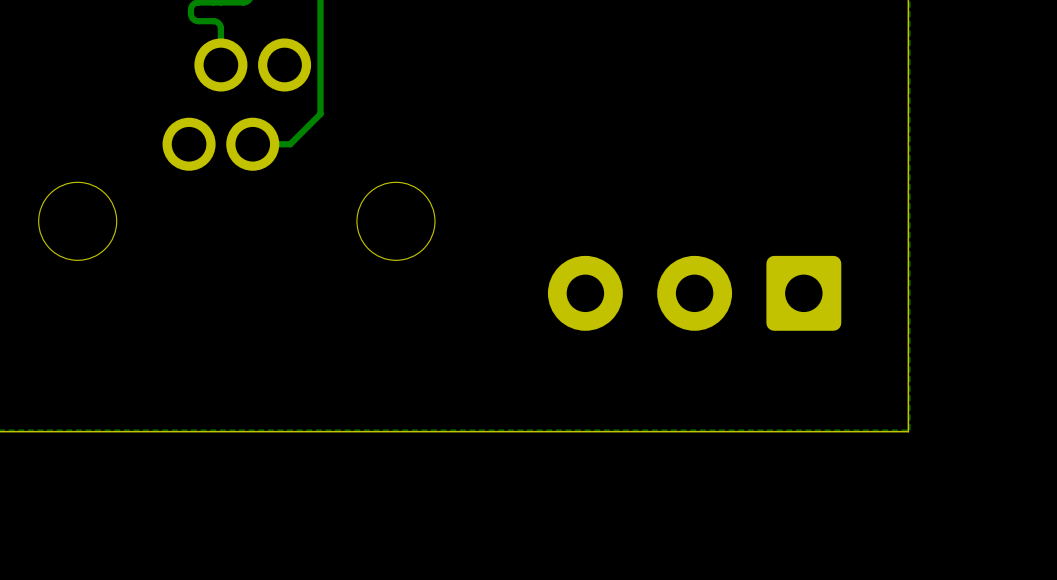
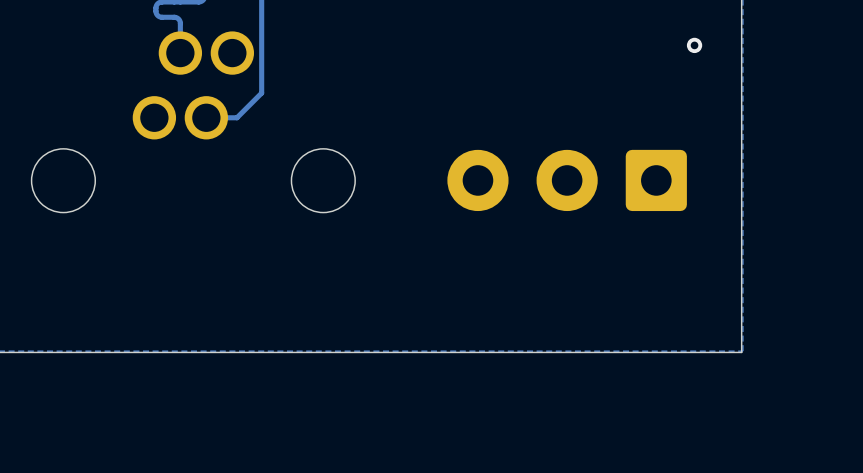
via: none -> (694, 45)
part position: (694, 293) -> (567, 180)

